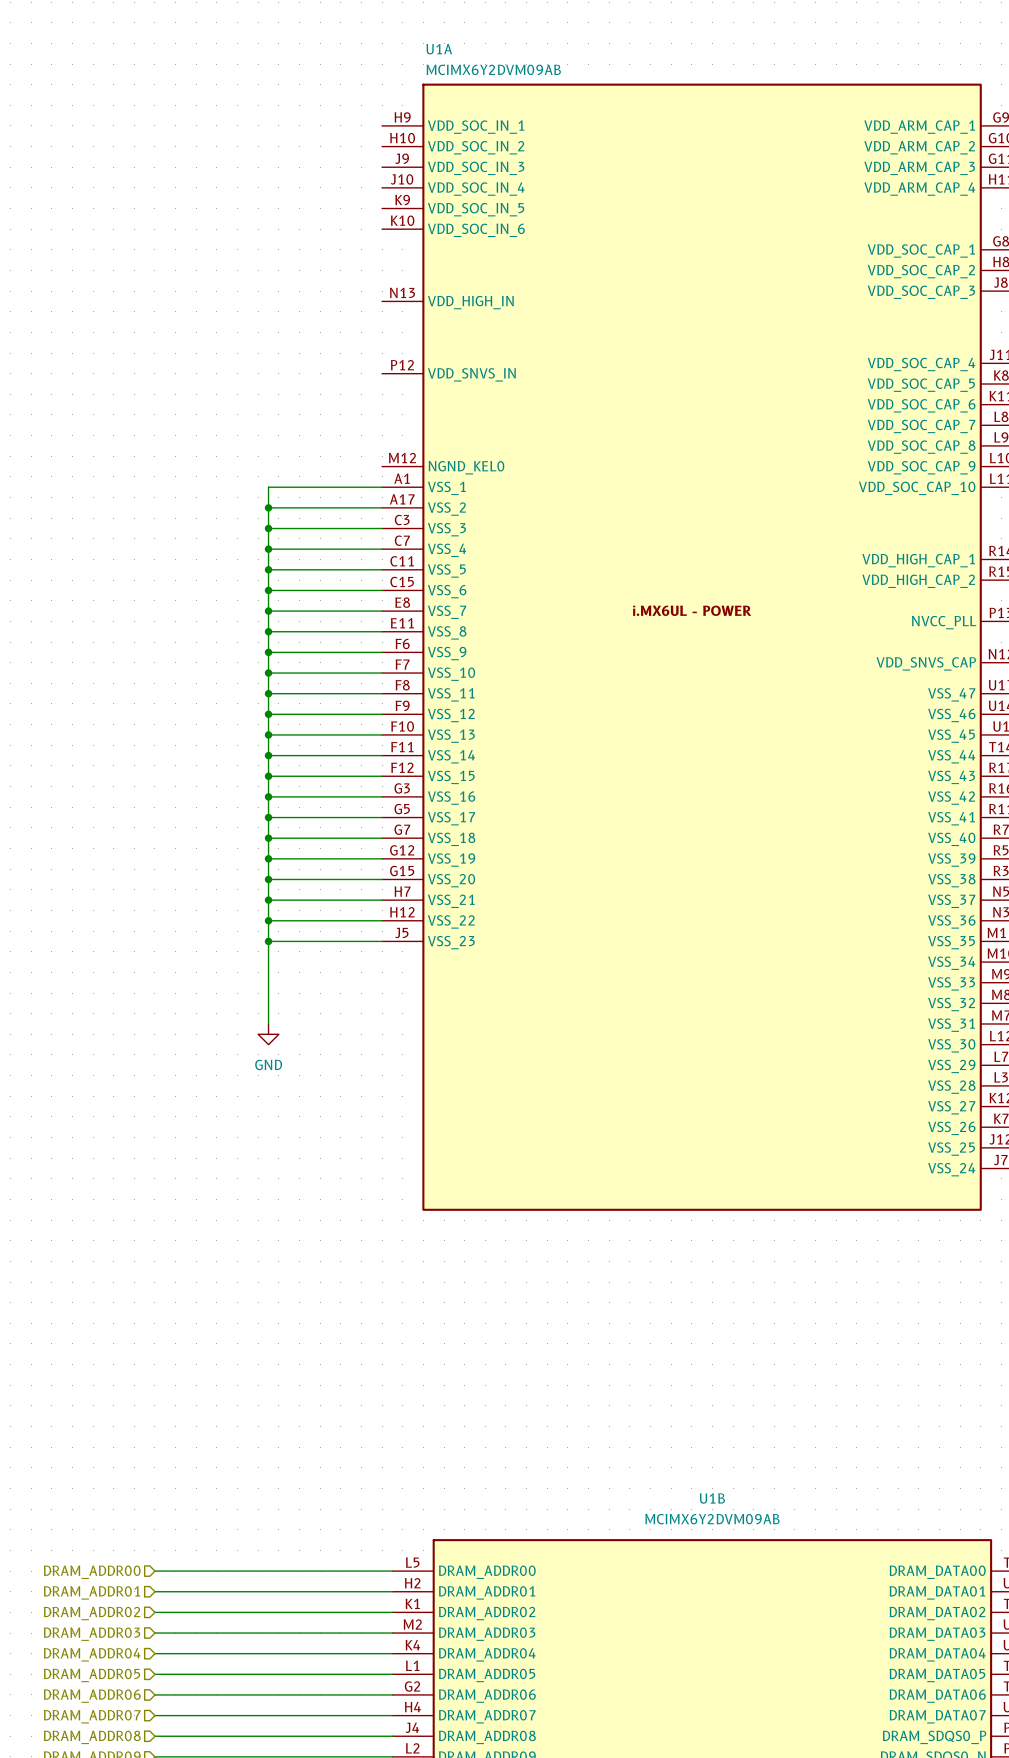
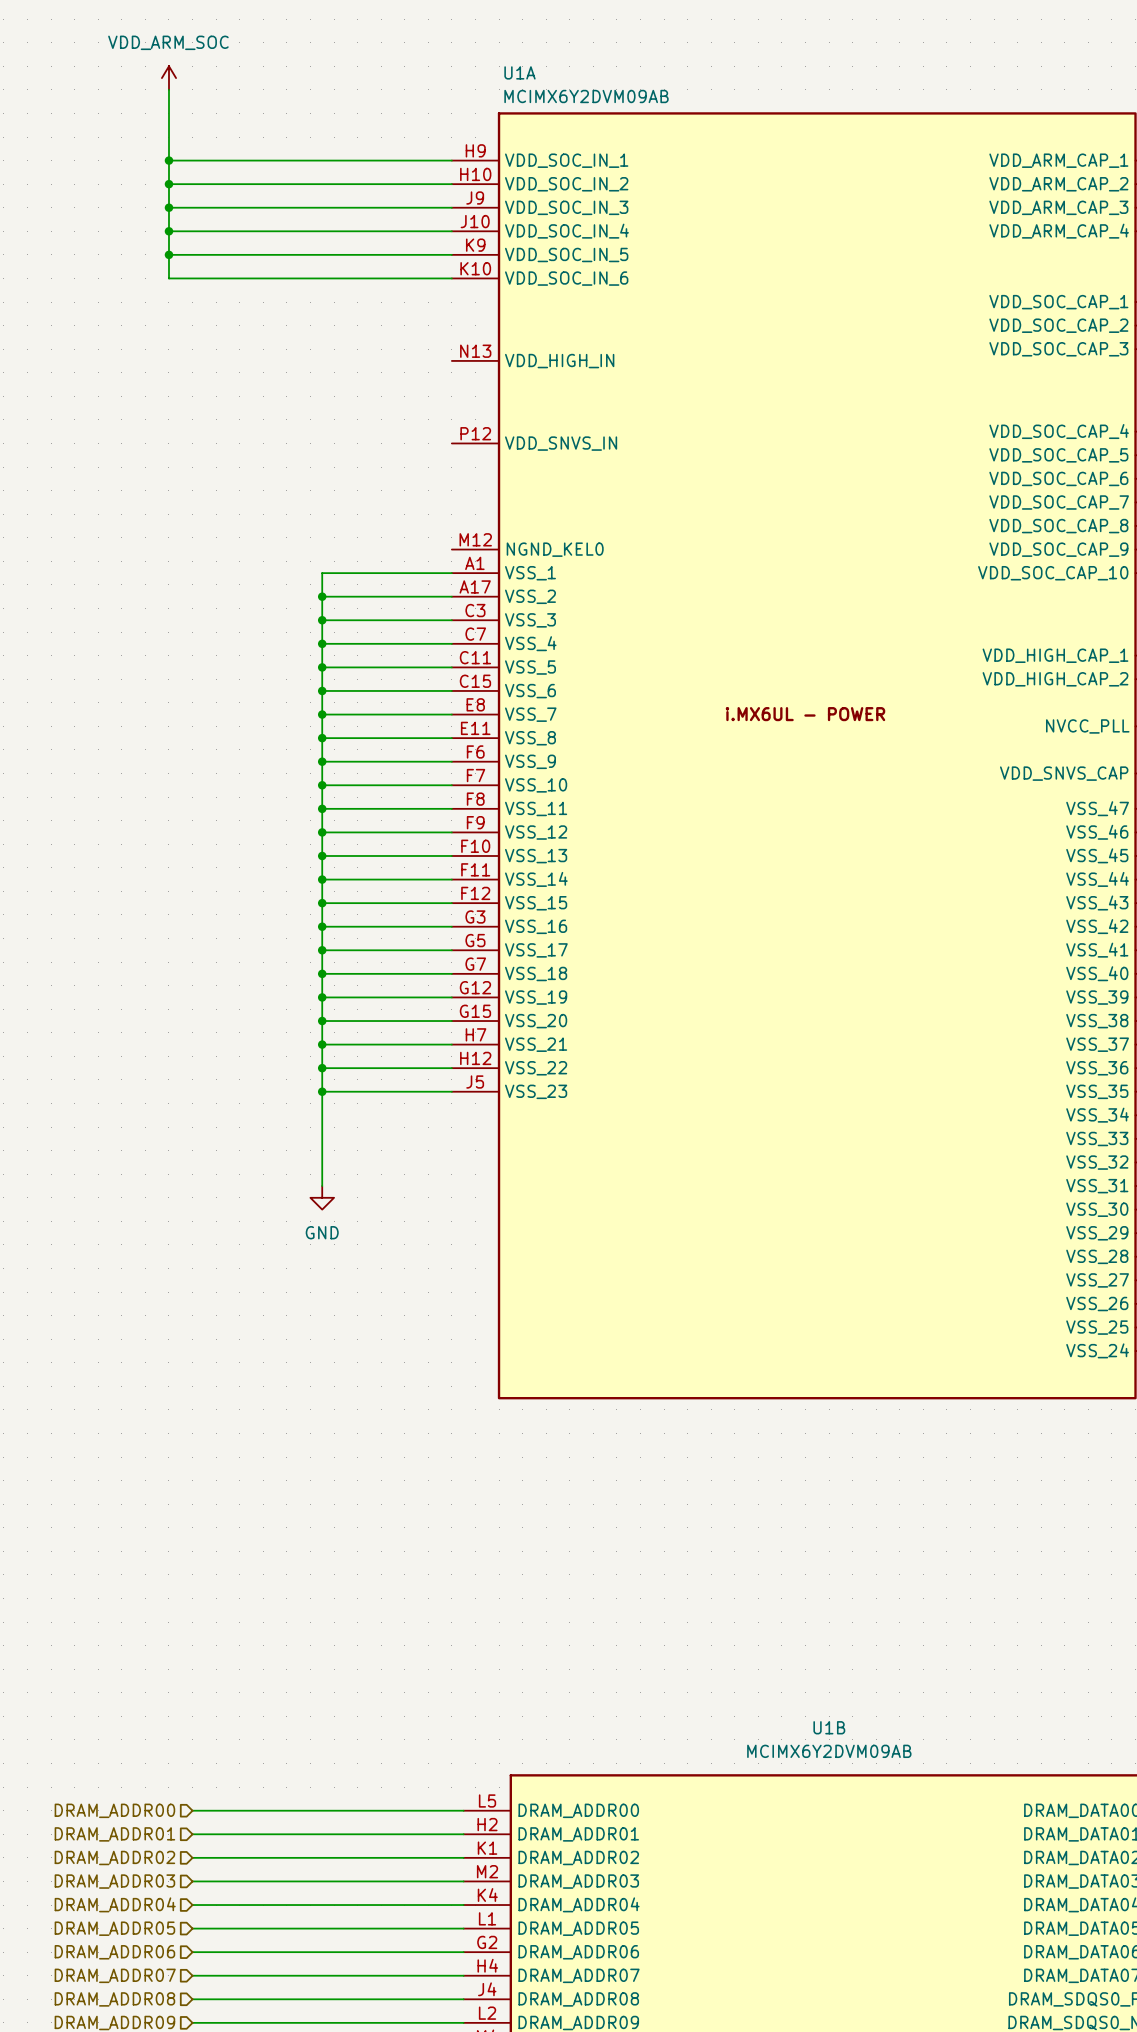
power symbol: none -> VDD_ARM_SOC (168, 78)
wire: none -> (168, 89) (168, 278) (451, 278)
wire: none -> (168, 160) (451, 160)
junction: none -> (168, 160)
wire: none -> (168, 184) (451, 184)
junction: none -> (168, 184)
wire: none -> (168, 207) (451, 207)
junction: none -> (168, 207)
wire: none -> (168, 231) (451, 231)
junction: none -> (168, 231)
wire: none -> (168, 254) (451, 254)
junction: none -> (168, 254)

